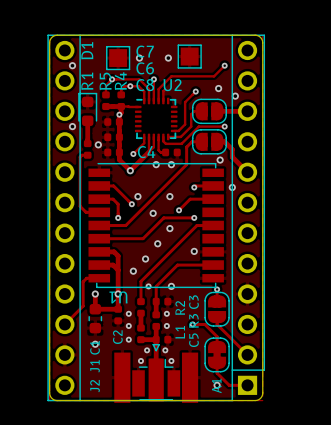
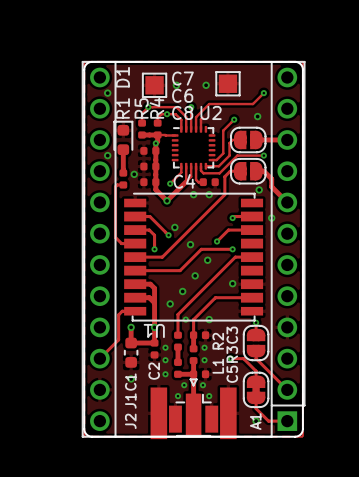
via: (235, 96) -> none
via: (169, 196) -> none

